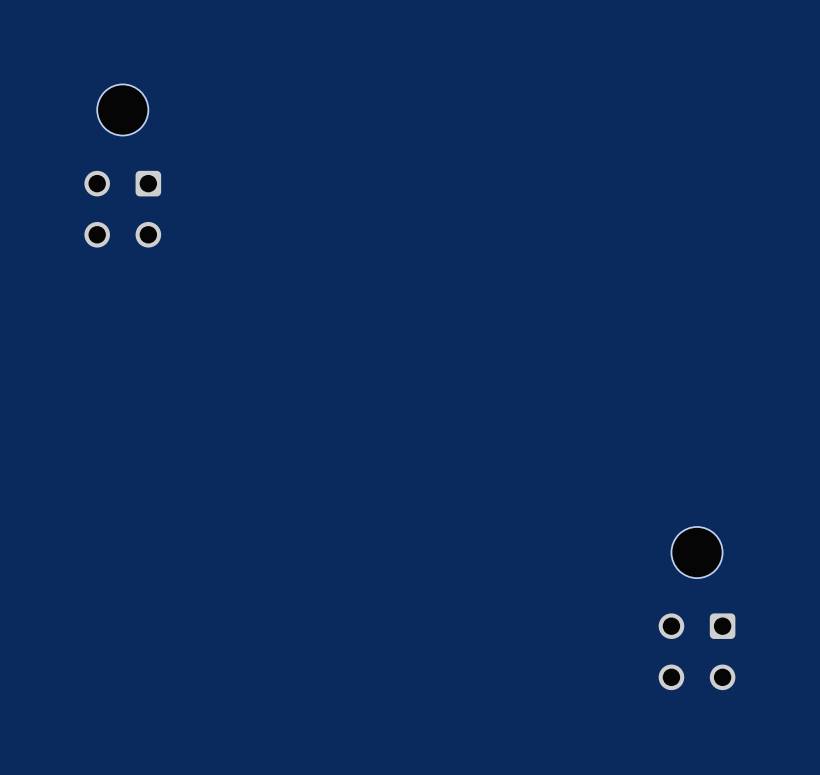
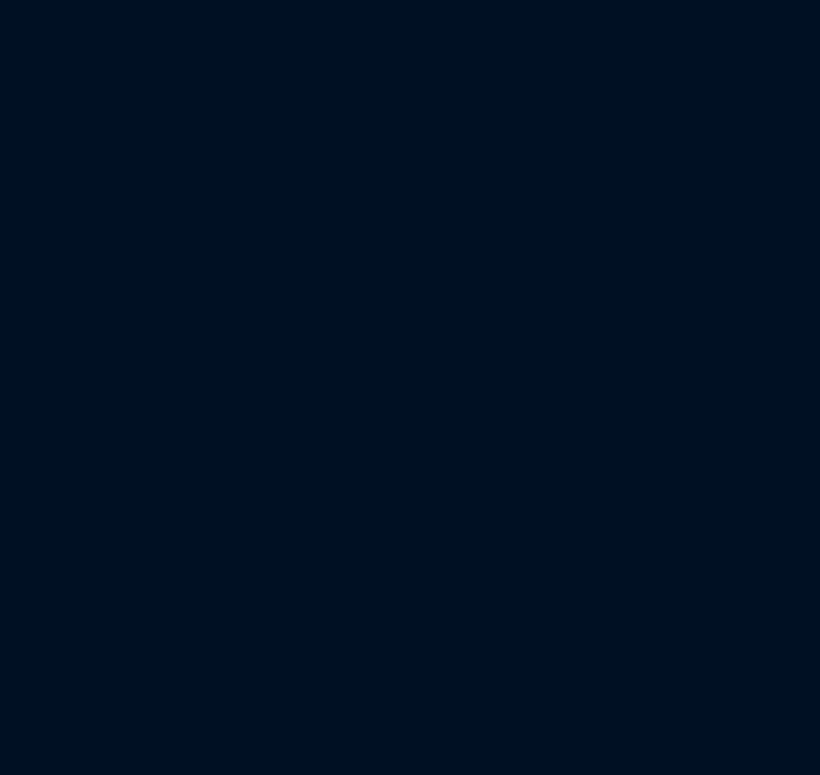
part: (122, 165) -> none
part: (697, 608) -> none

